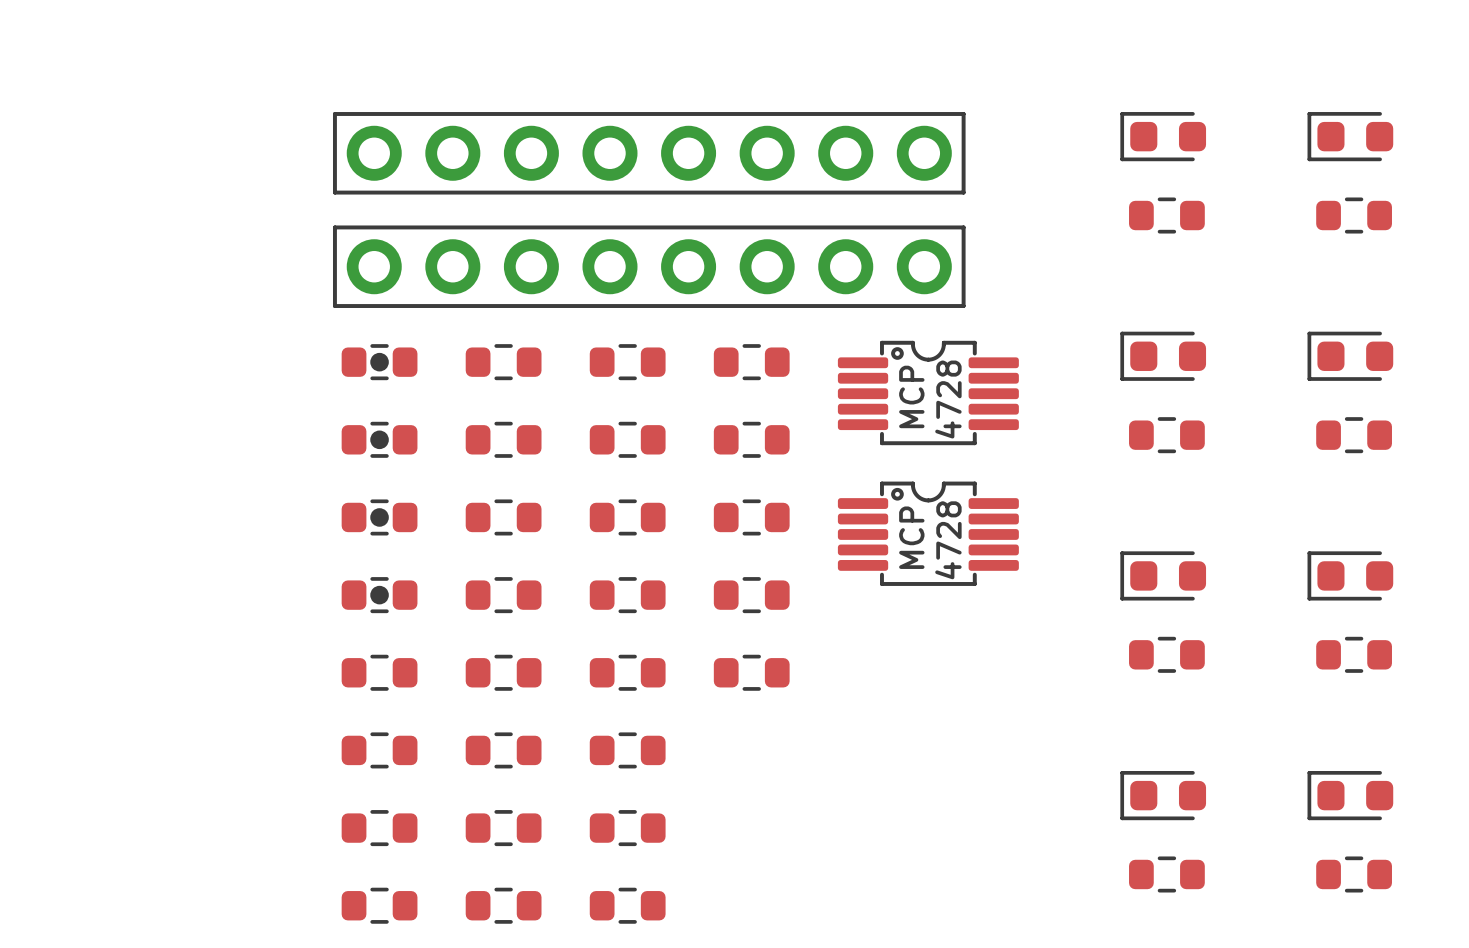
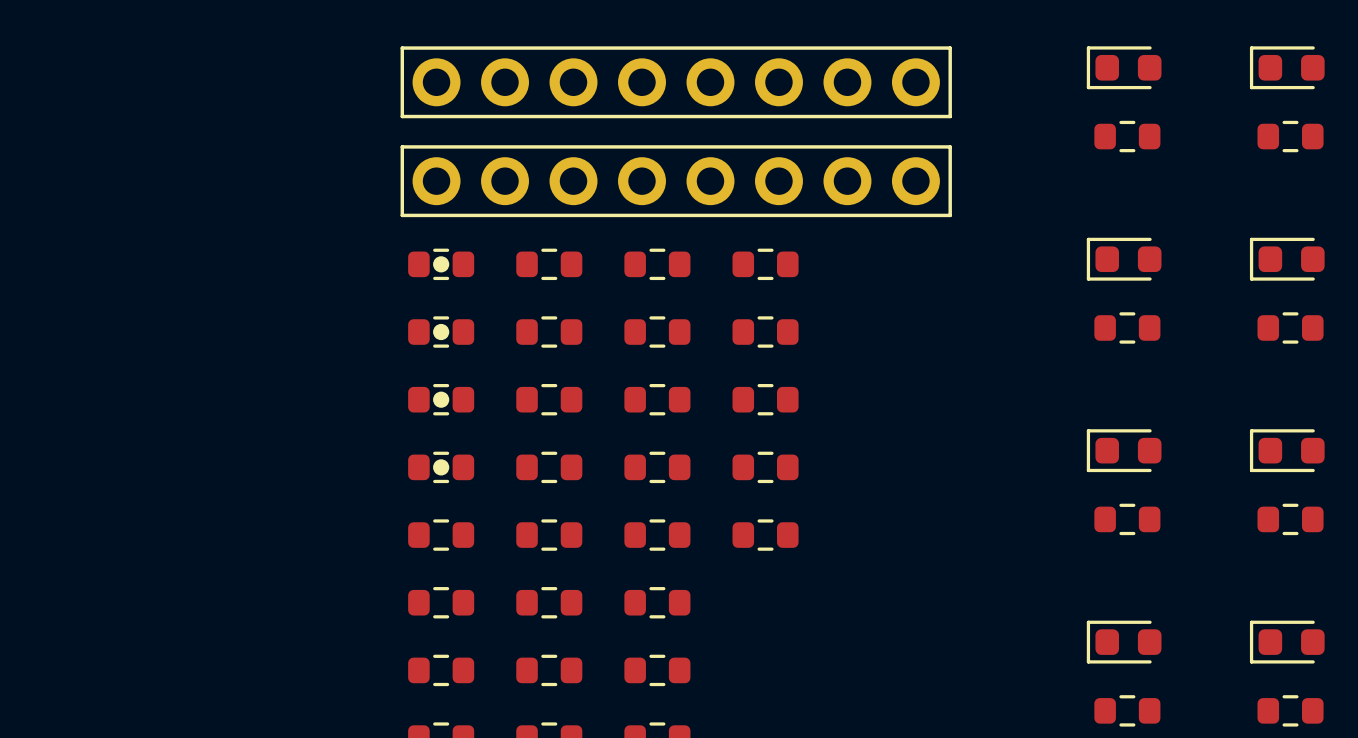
part: (928, 392) -> none
part: (928, 533) -> none

